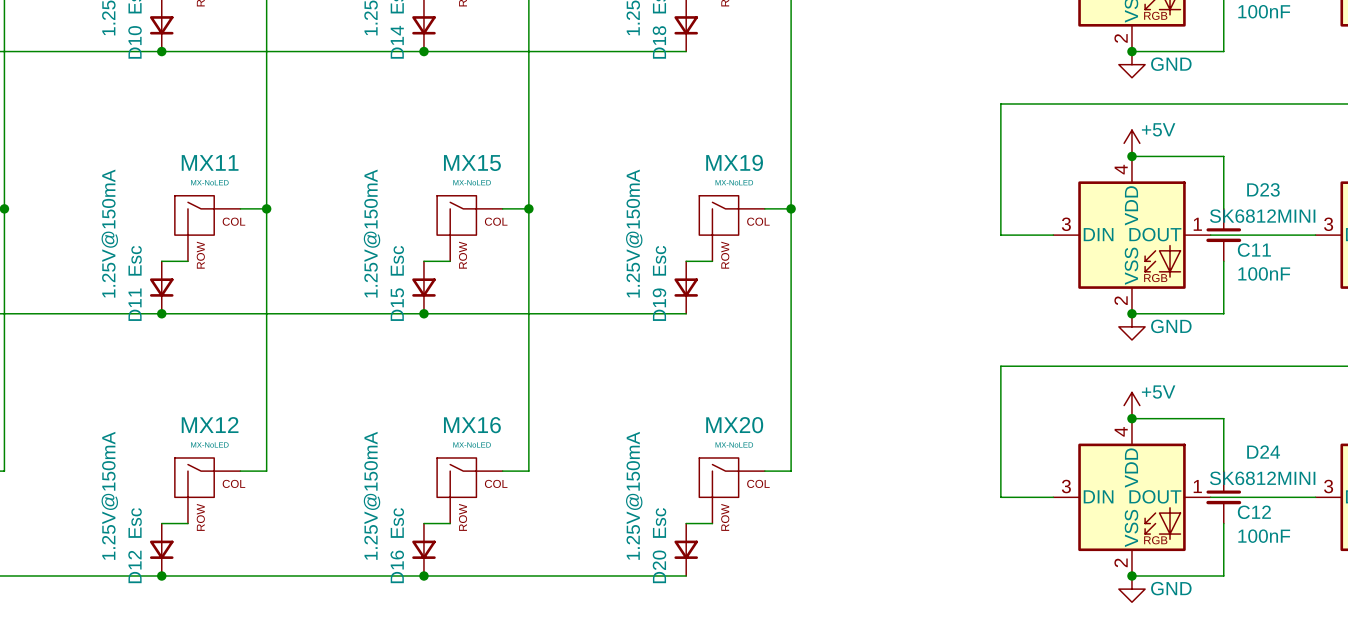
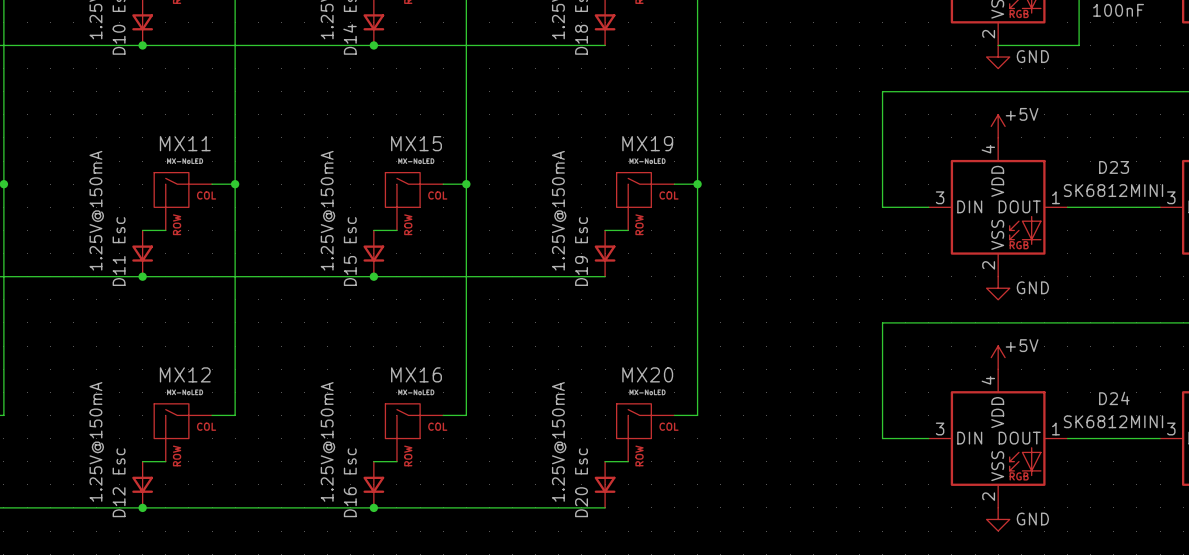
junction: (1131, 51) -> none
wire: (1131, 156) (1223, 156) (1223, 208) -> none
junction: (1131, 156) -> none
C11: 100nF (1223, 235) -> none
wire: (1223, 261) (1223, 313) (1131, 313) -> none
junction: (1131, 313) -> none
wire: (1131, 418) (1223, 418) (1223, 471) -> none
junction: (1131, 418) -> none
C12: 100nF (1223, 497) -> none
wire: (1223, 523) (1223, 575) (1131, 575) -> none
junction: (1131, 575) -> none

